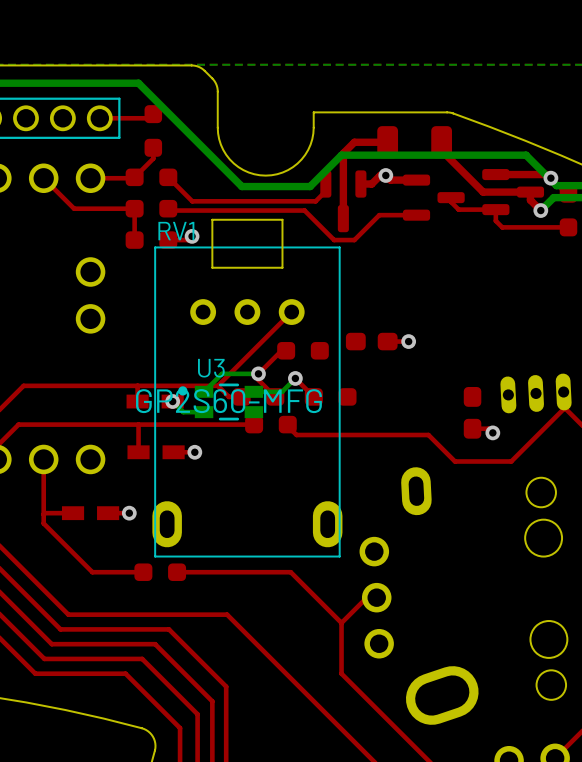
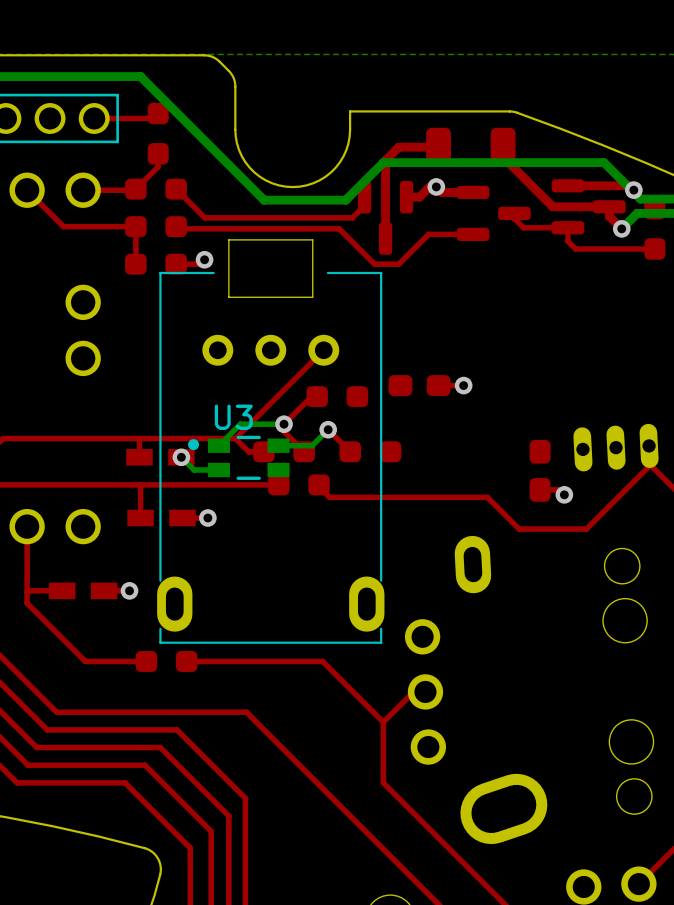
U3 value: GP2S60-MFG (228, 401) -> none
RV1: (247, 401) -> none
part: none -> (270, 457)

